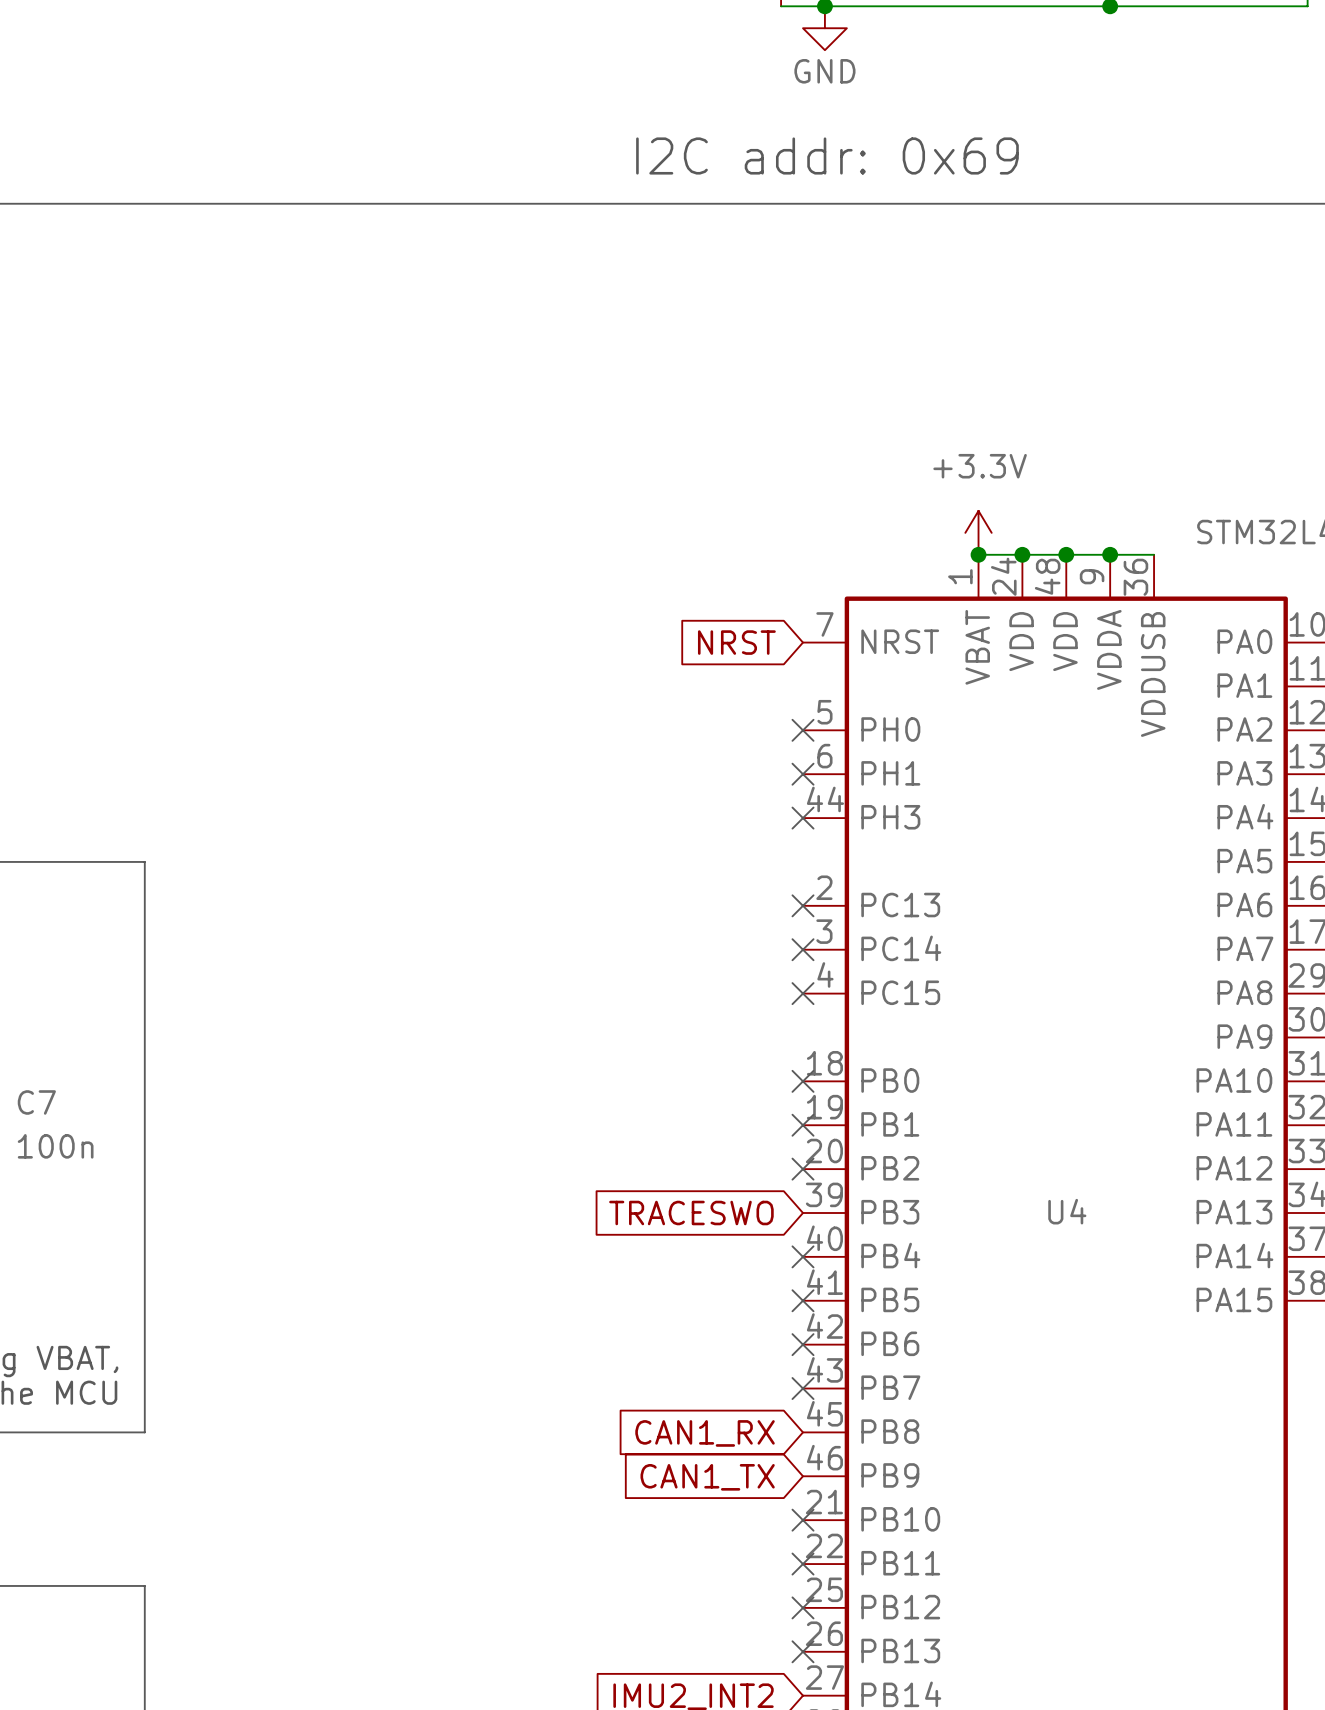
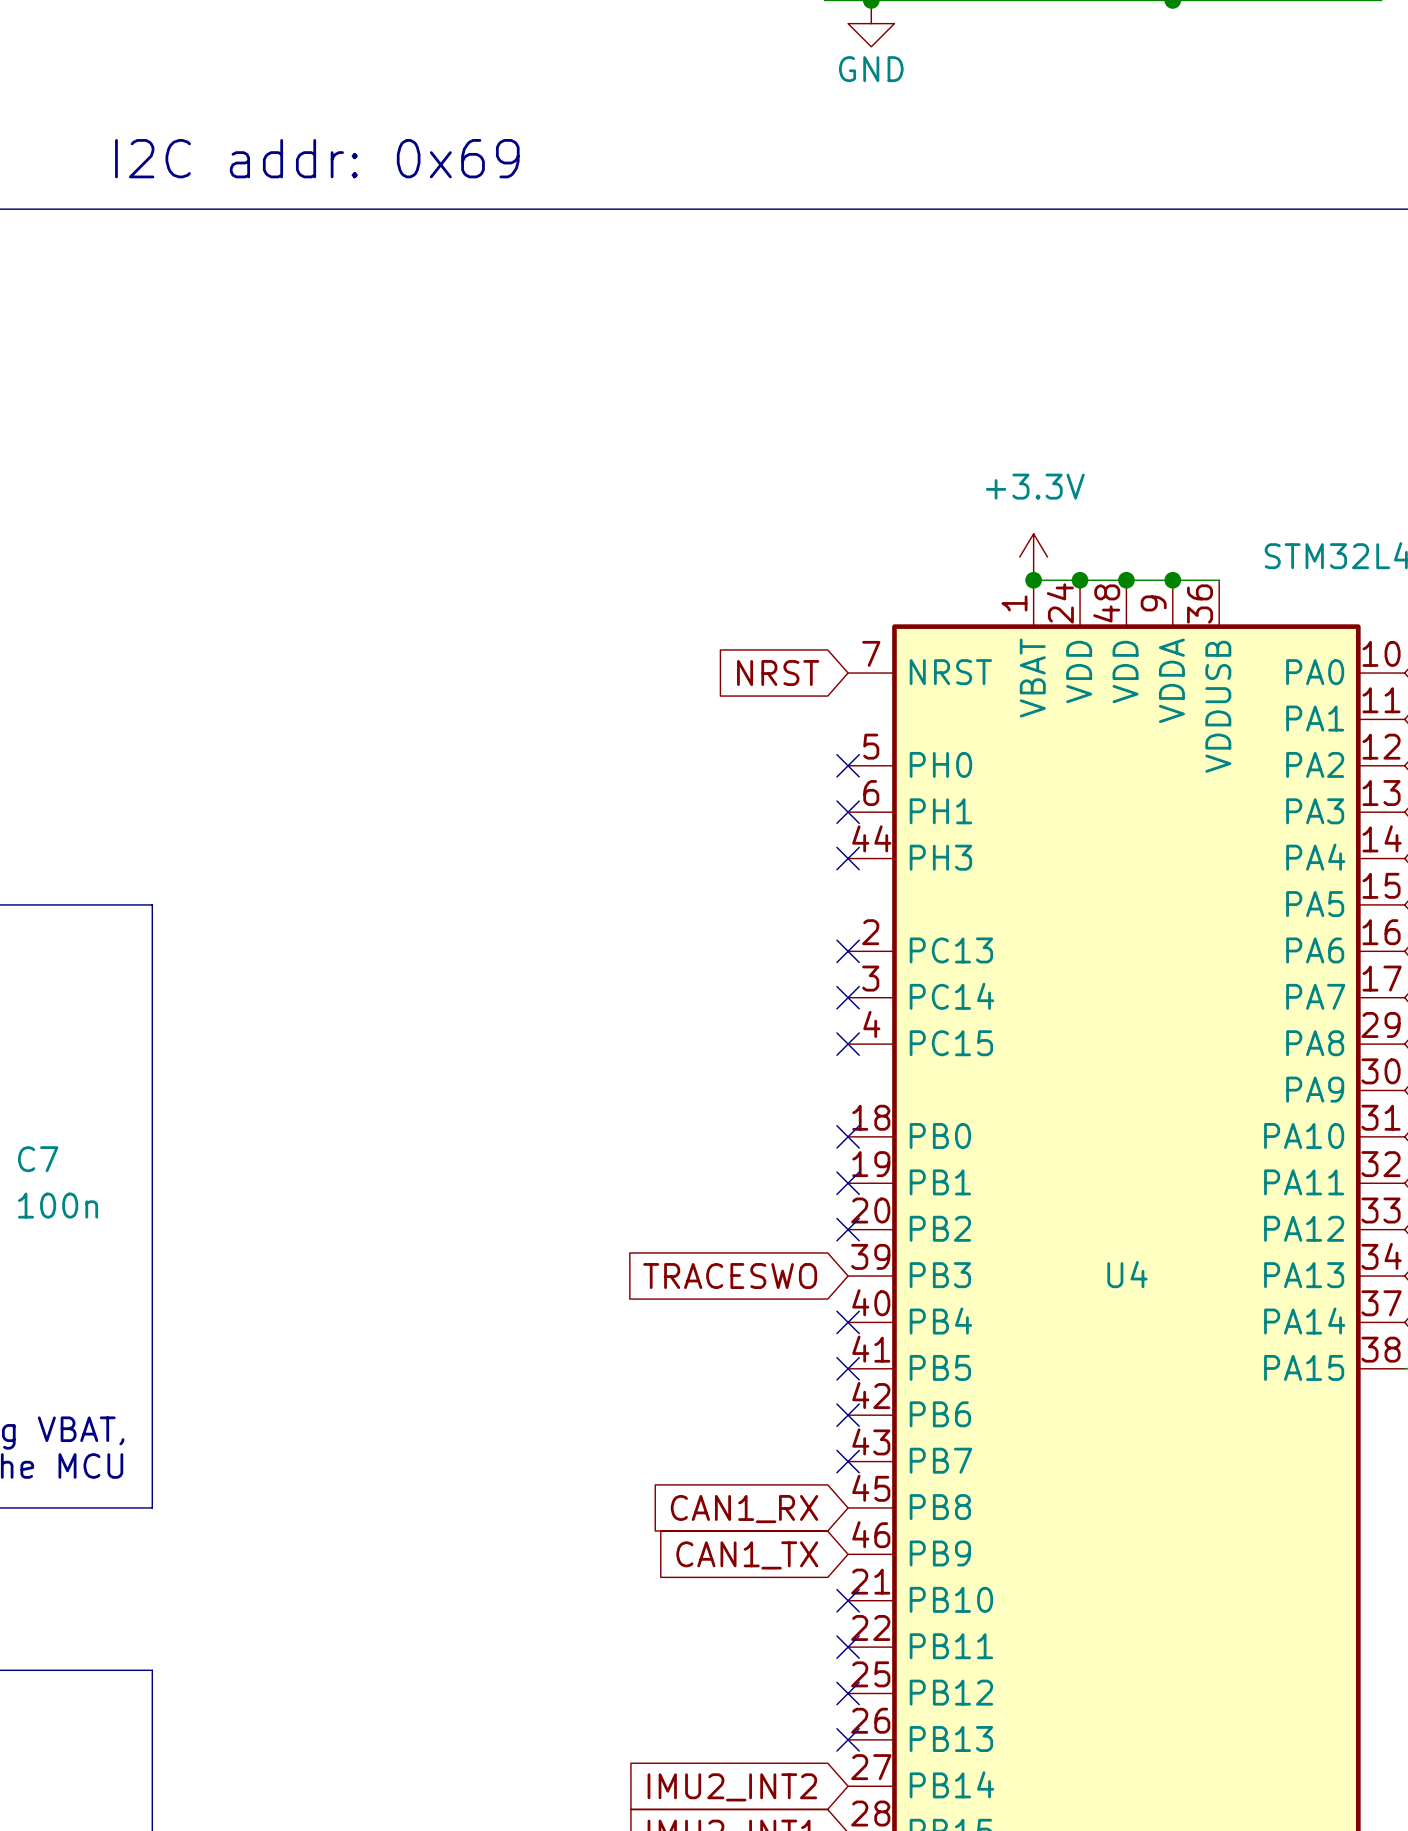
text: none -> I2C addr: 0x69 (317, 158)
text: I2C addr: 0x69 (827, 155) -> none

